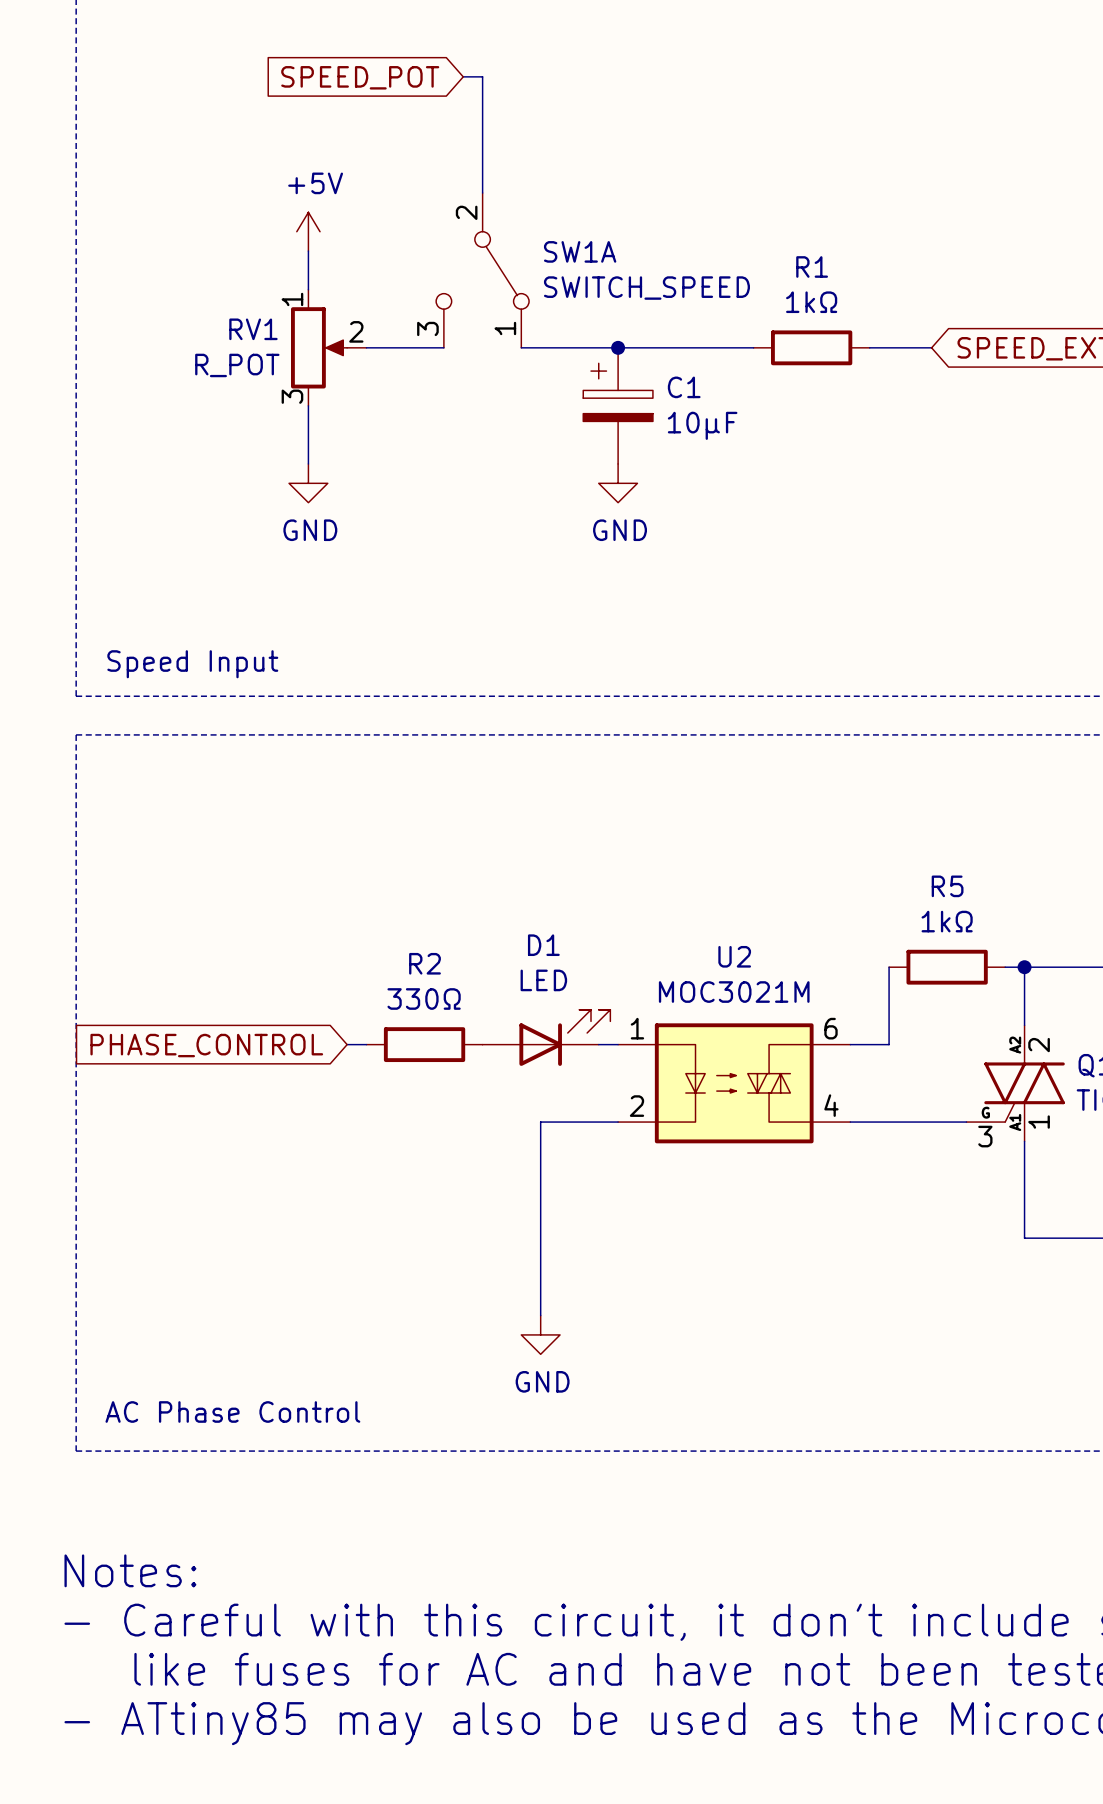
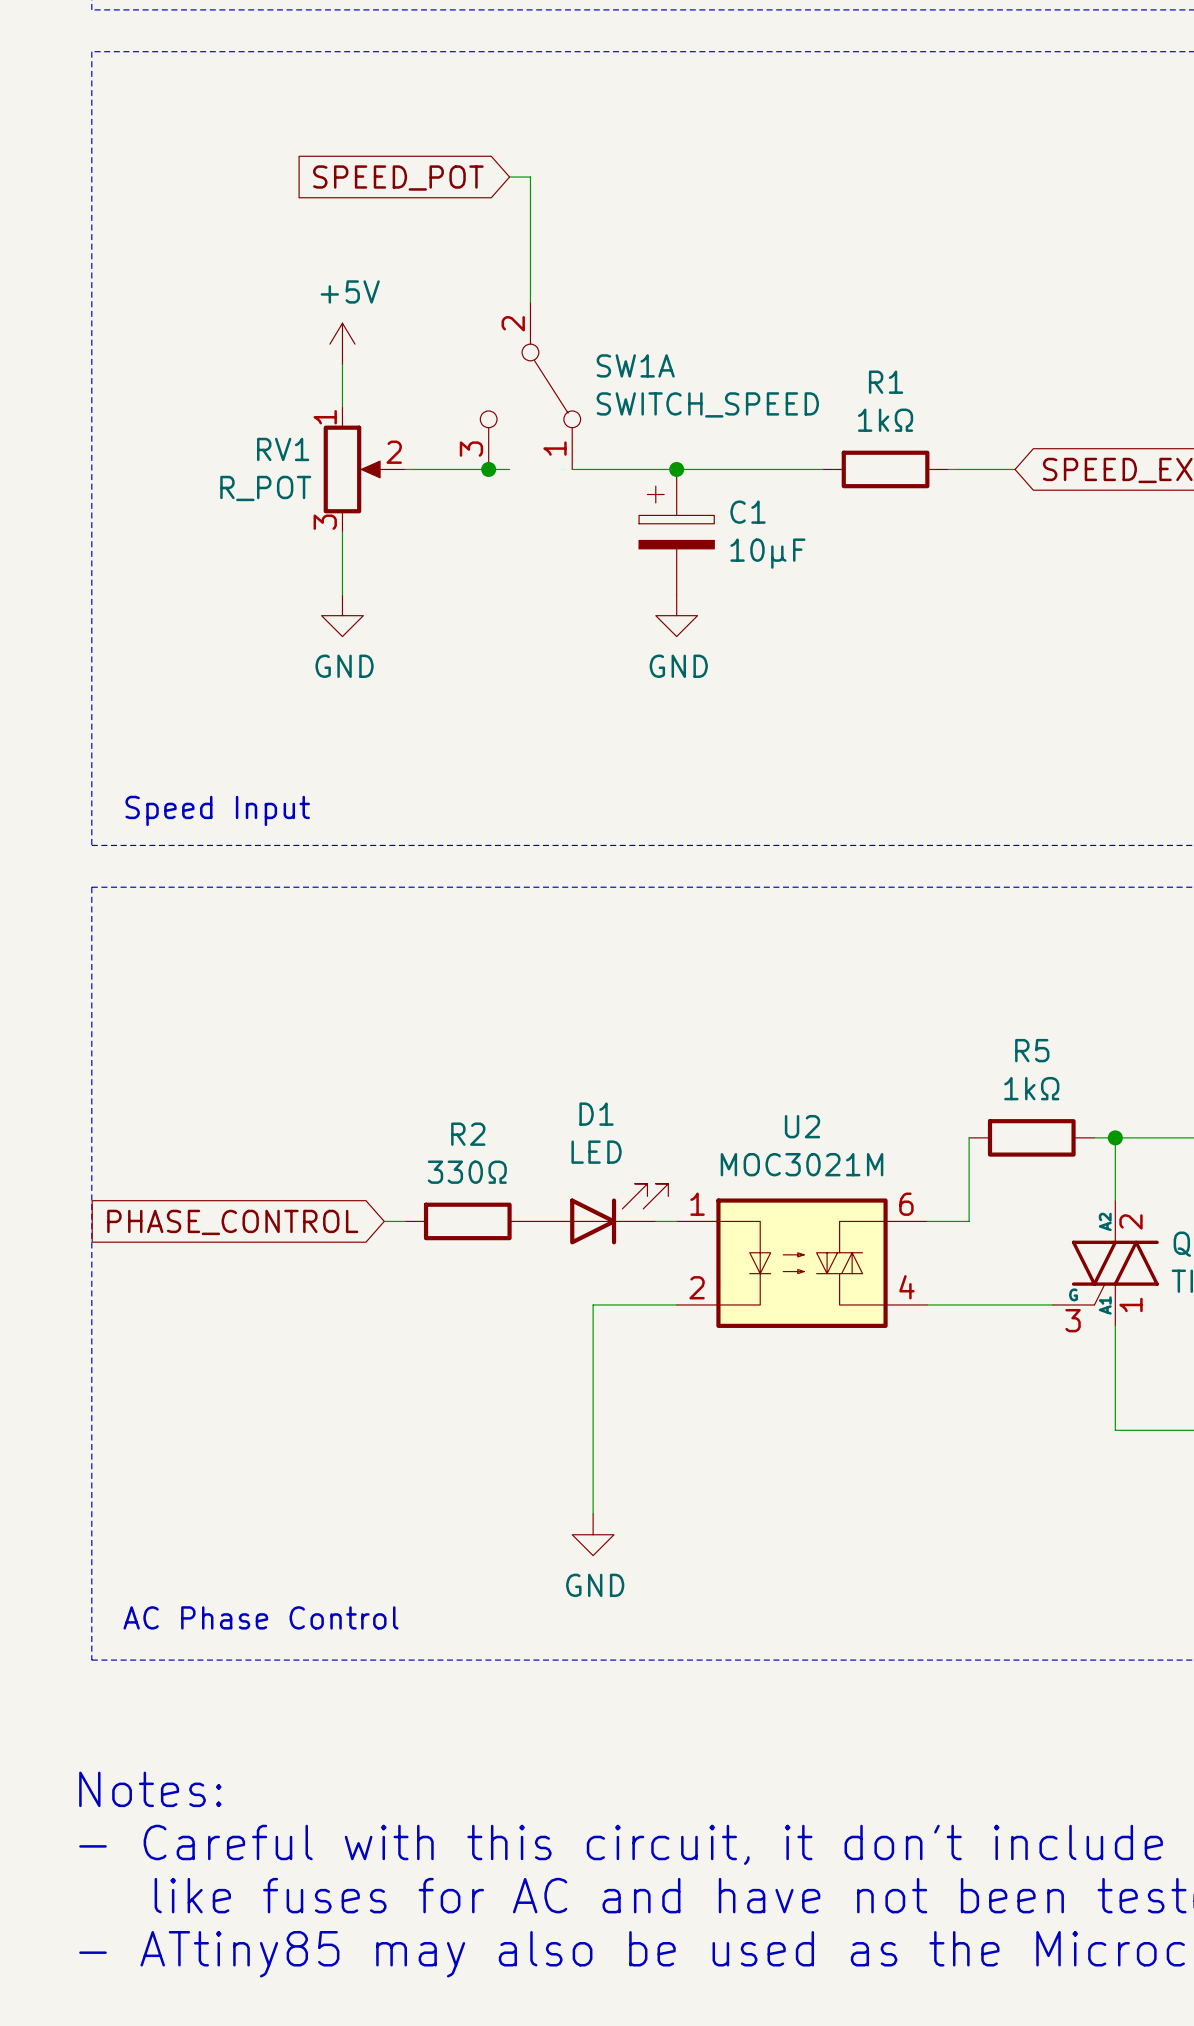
wire: none -> (488, 469) (509, 469)
junction: none -> (488, 469)

